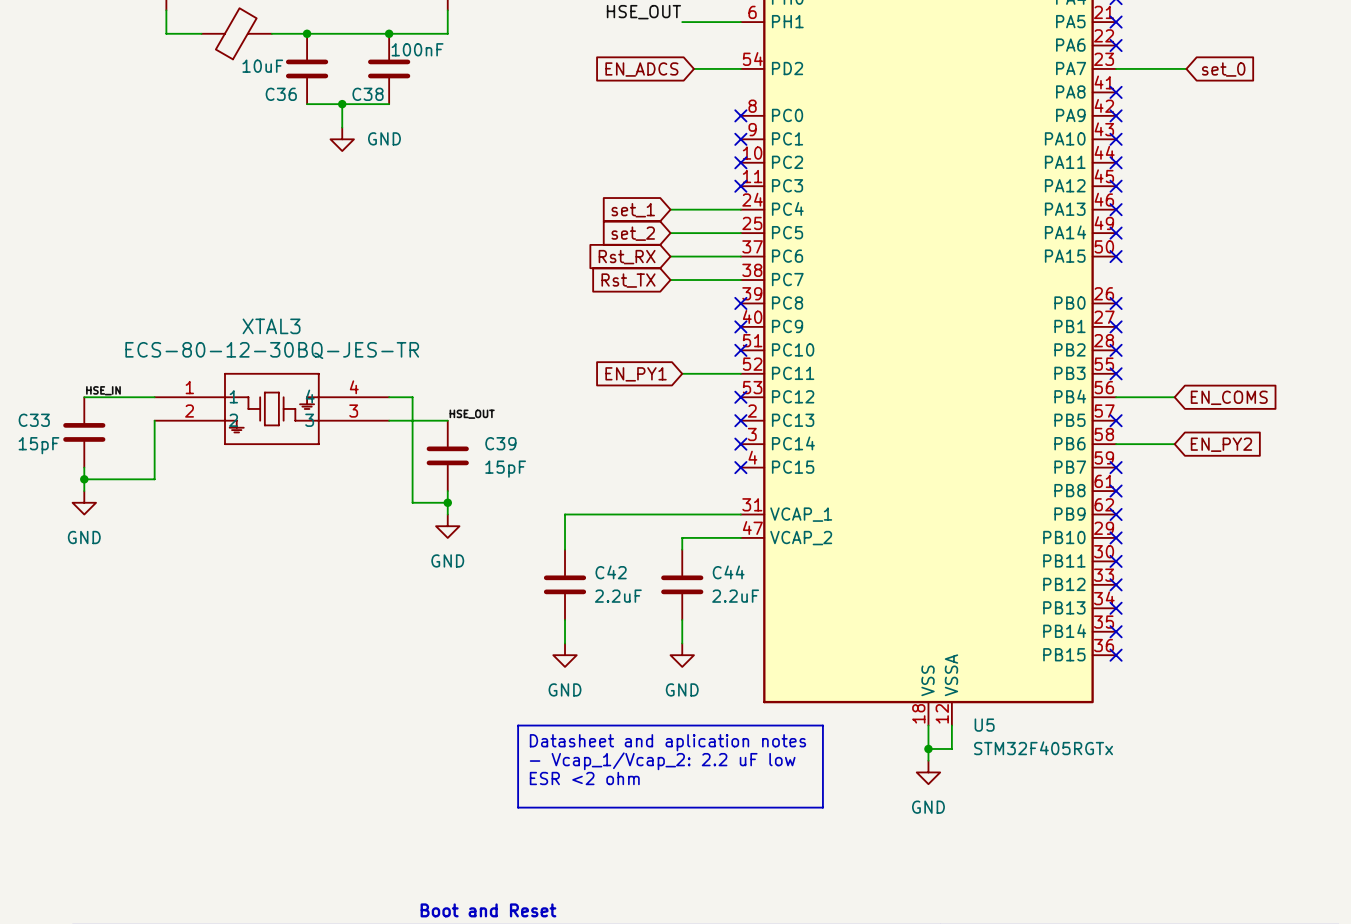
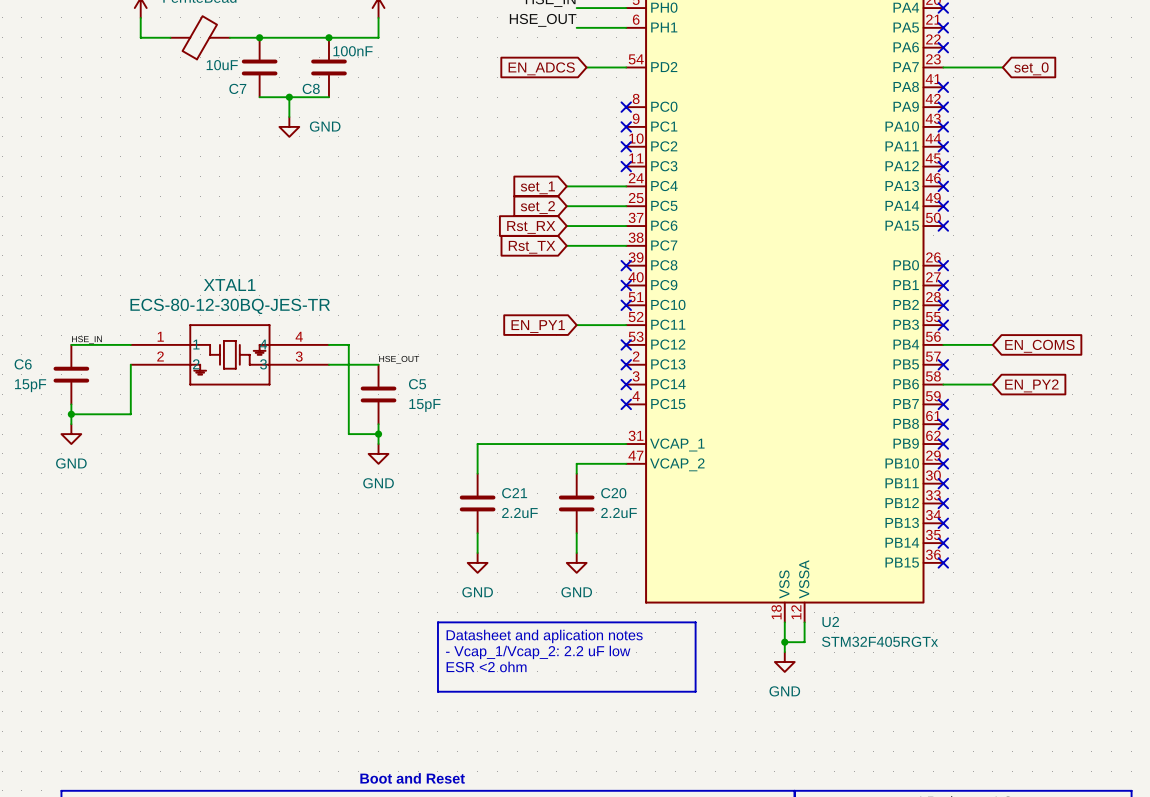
C36 name: C36 (281, 94) -> C7 (237, 88)
C38 name: C38 (368, 94) -> C8 (311, 88)
XTAL3 name: XTAL3 (271, 326) -> XTAL1 (229, 285)
C33 name: C33 (34, 420) -> C6 (23, 364)
C39 name: C39 (500, 443) -> C5 (417, 384)
C42 name: C42 (611, 572) -> C21 (514, 493)
C44 name: C44 (728, 572) -> C20 (613, 493)
U5 name: U5 (984, 725) -> U2 (830, 622)

